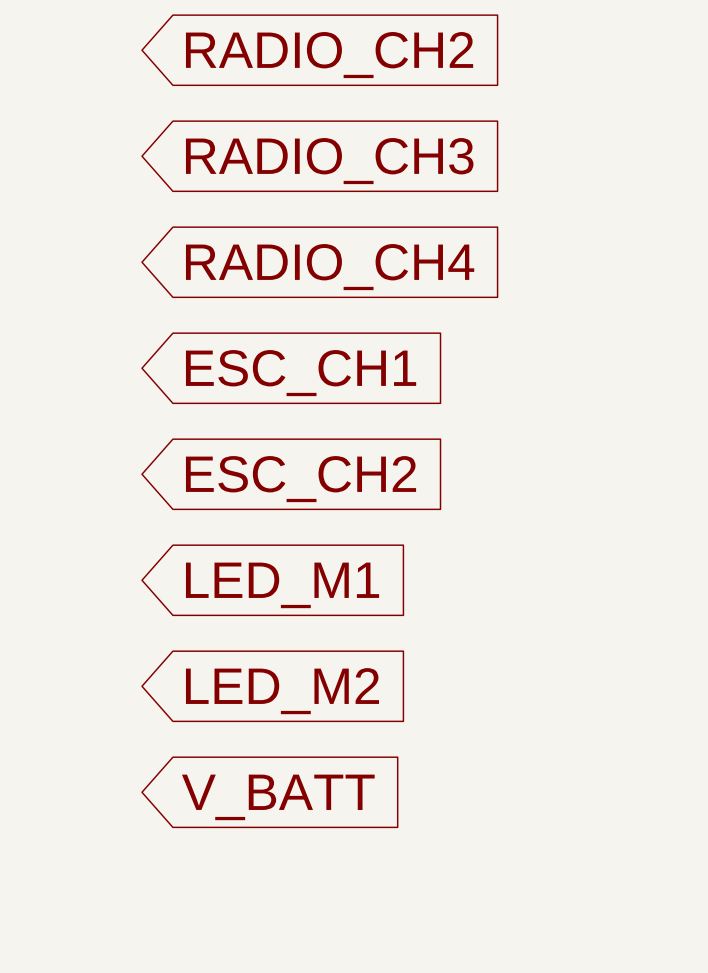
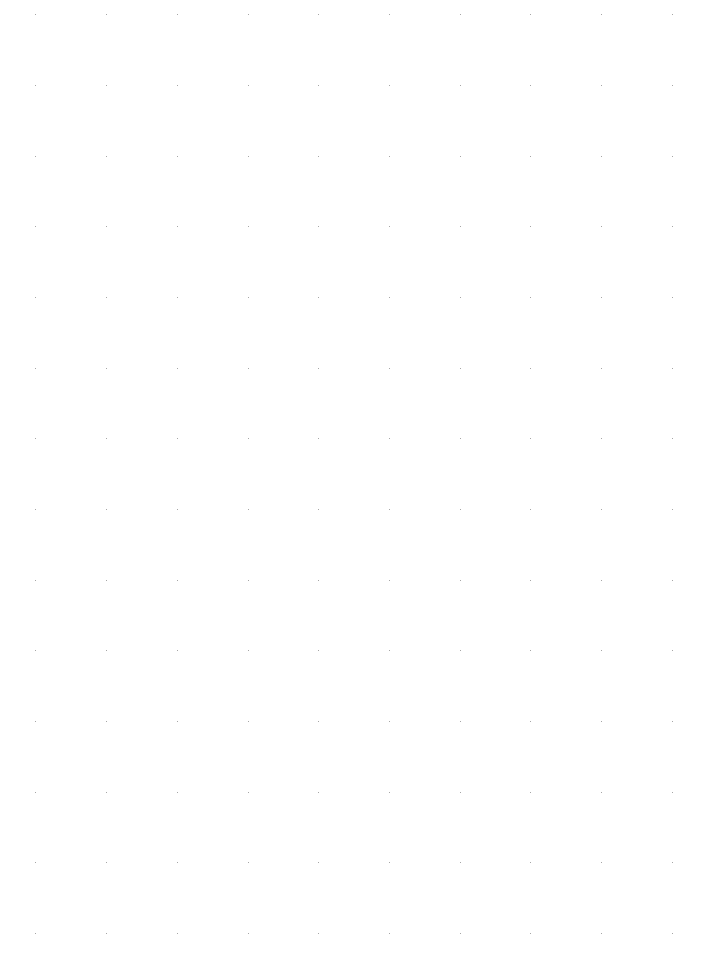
global label: RADIO_CH2 (329, 55) -> none
global label: RADIO_CH3 (329, 161) -> none
global label: RADIO_CH4 (330, 267) -> none
global label: ESC_CH1 (301, 373) -> none
global label: ESC_CH2 (301, 479) -> none
global label: LED_M1 (282, 585) -> none
global label: LED_M2 (282, 691) -> none
global label: V_BATT (278, 797) -> none

